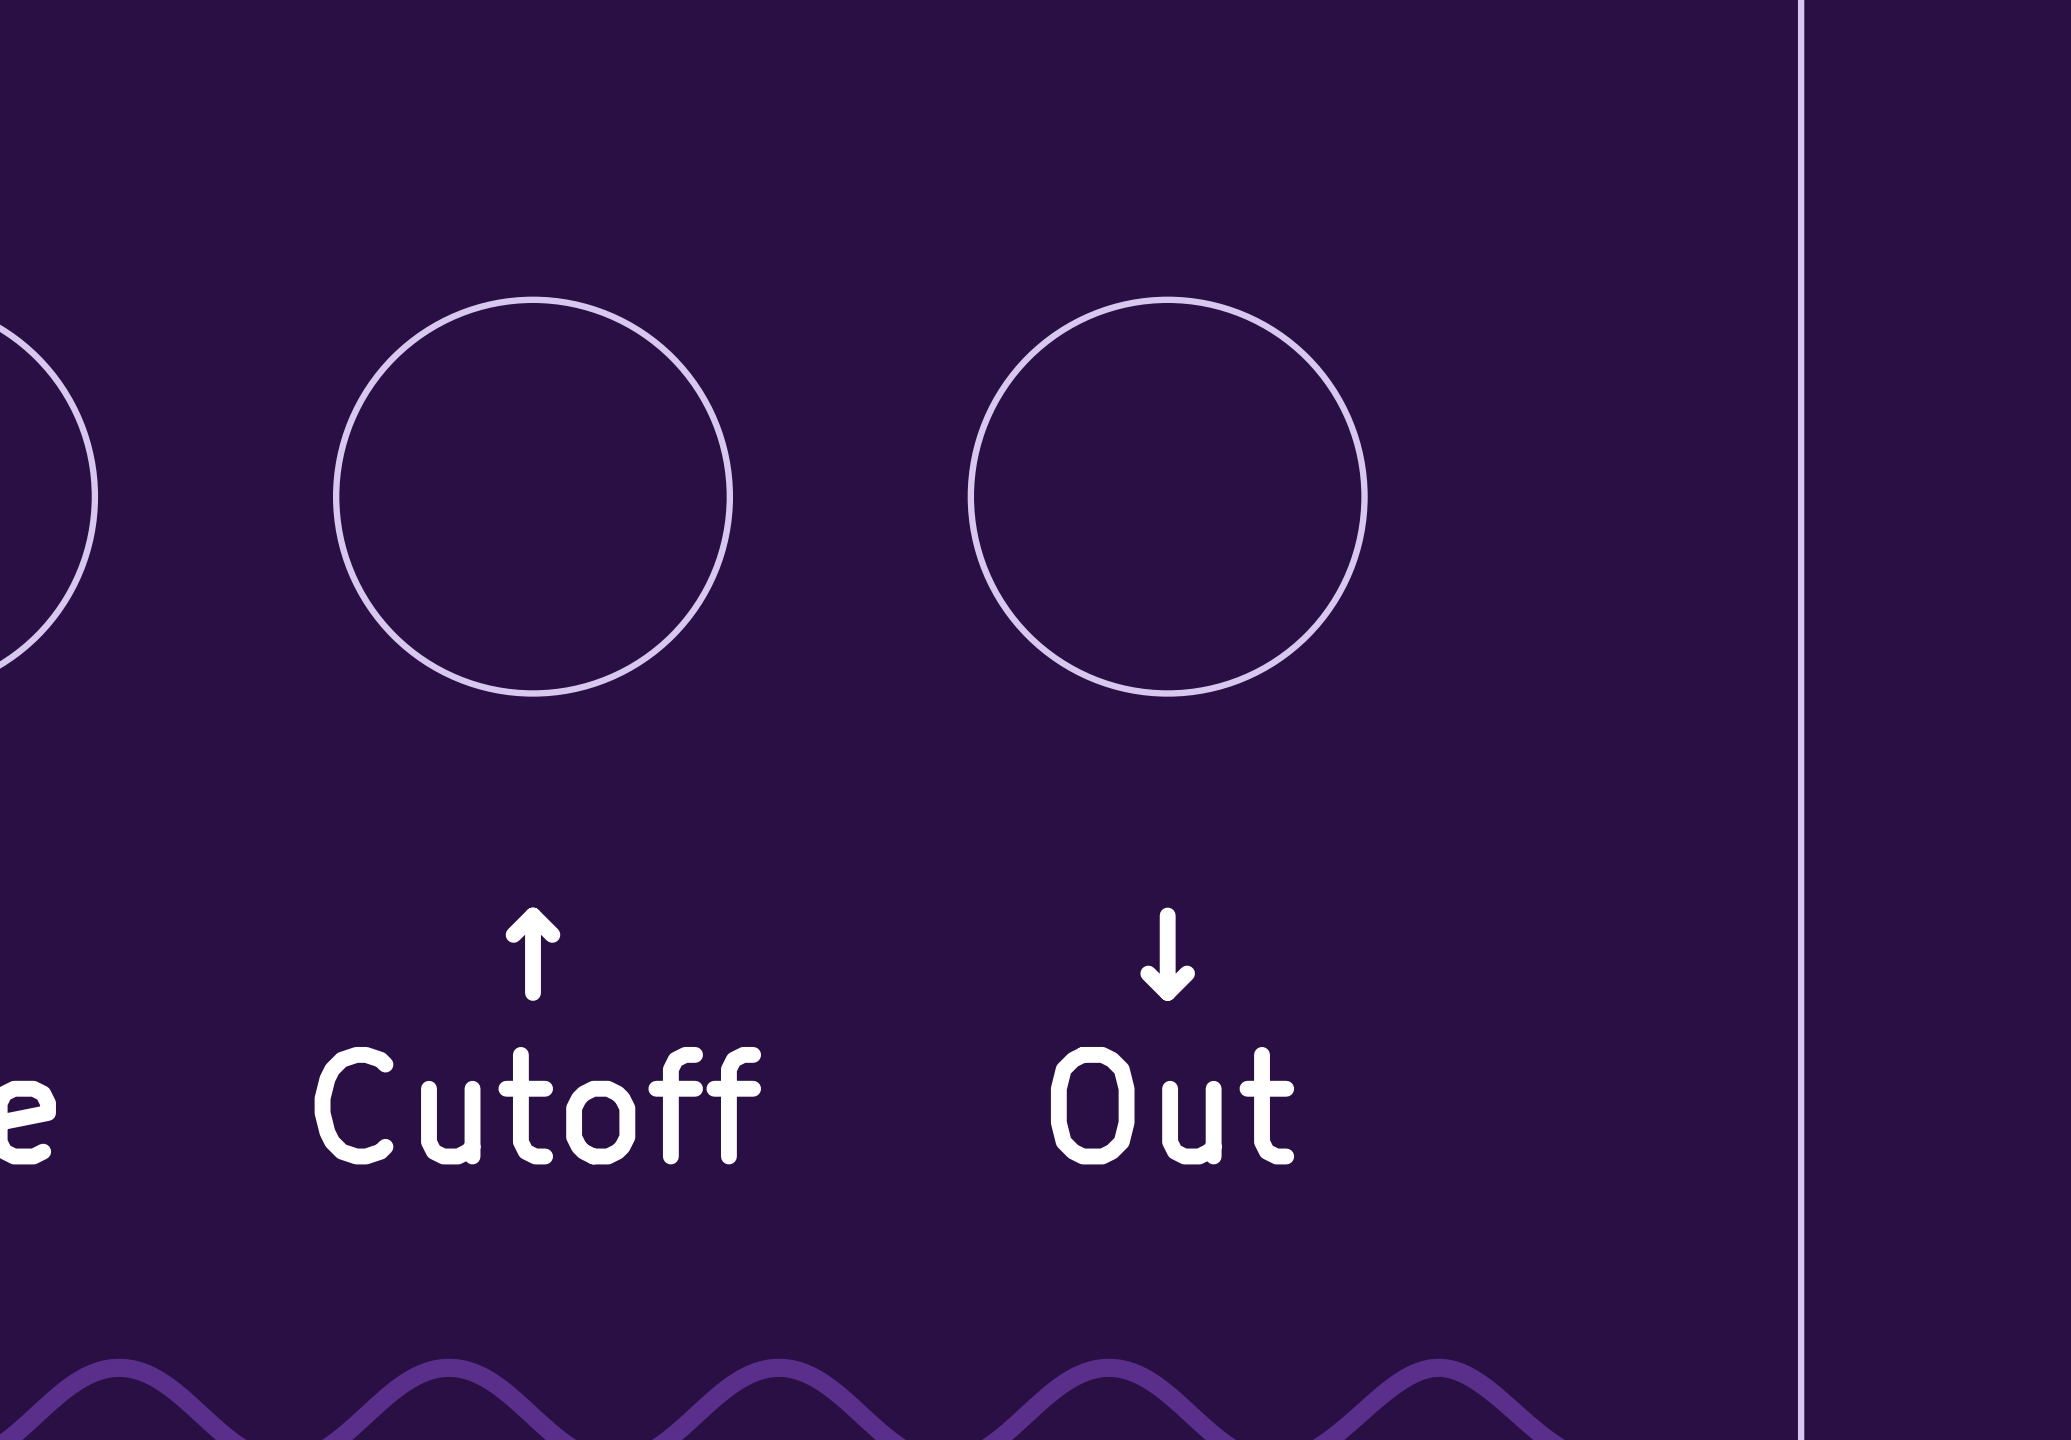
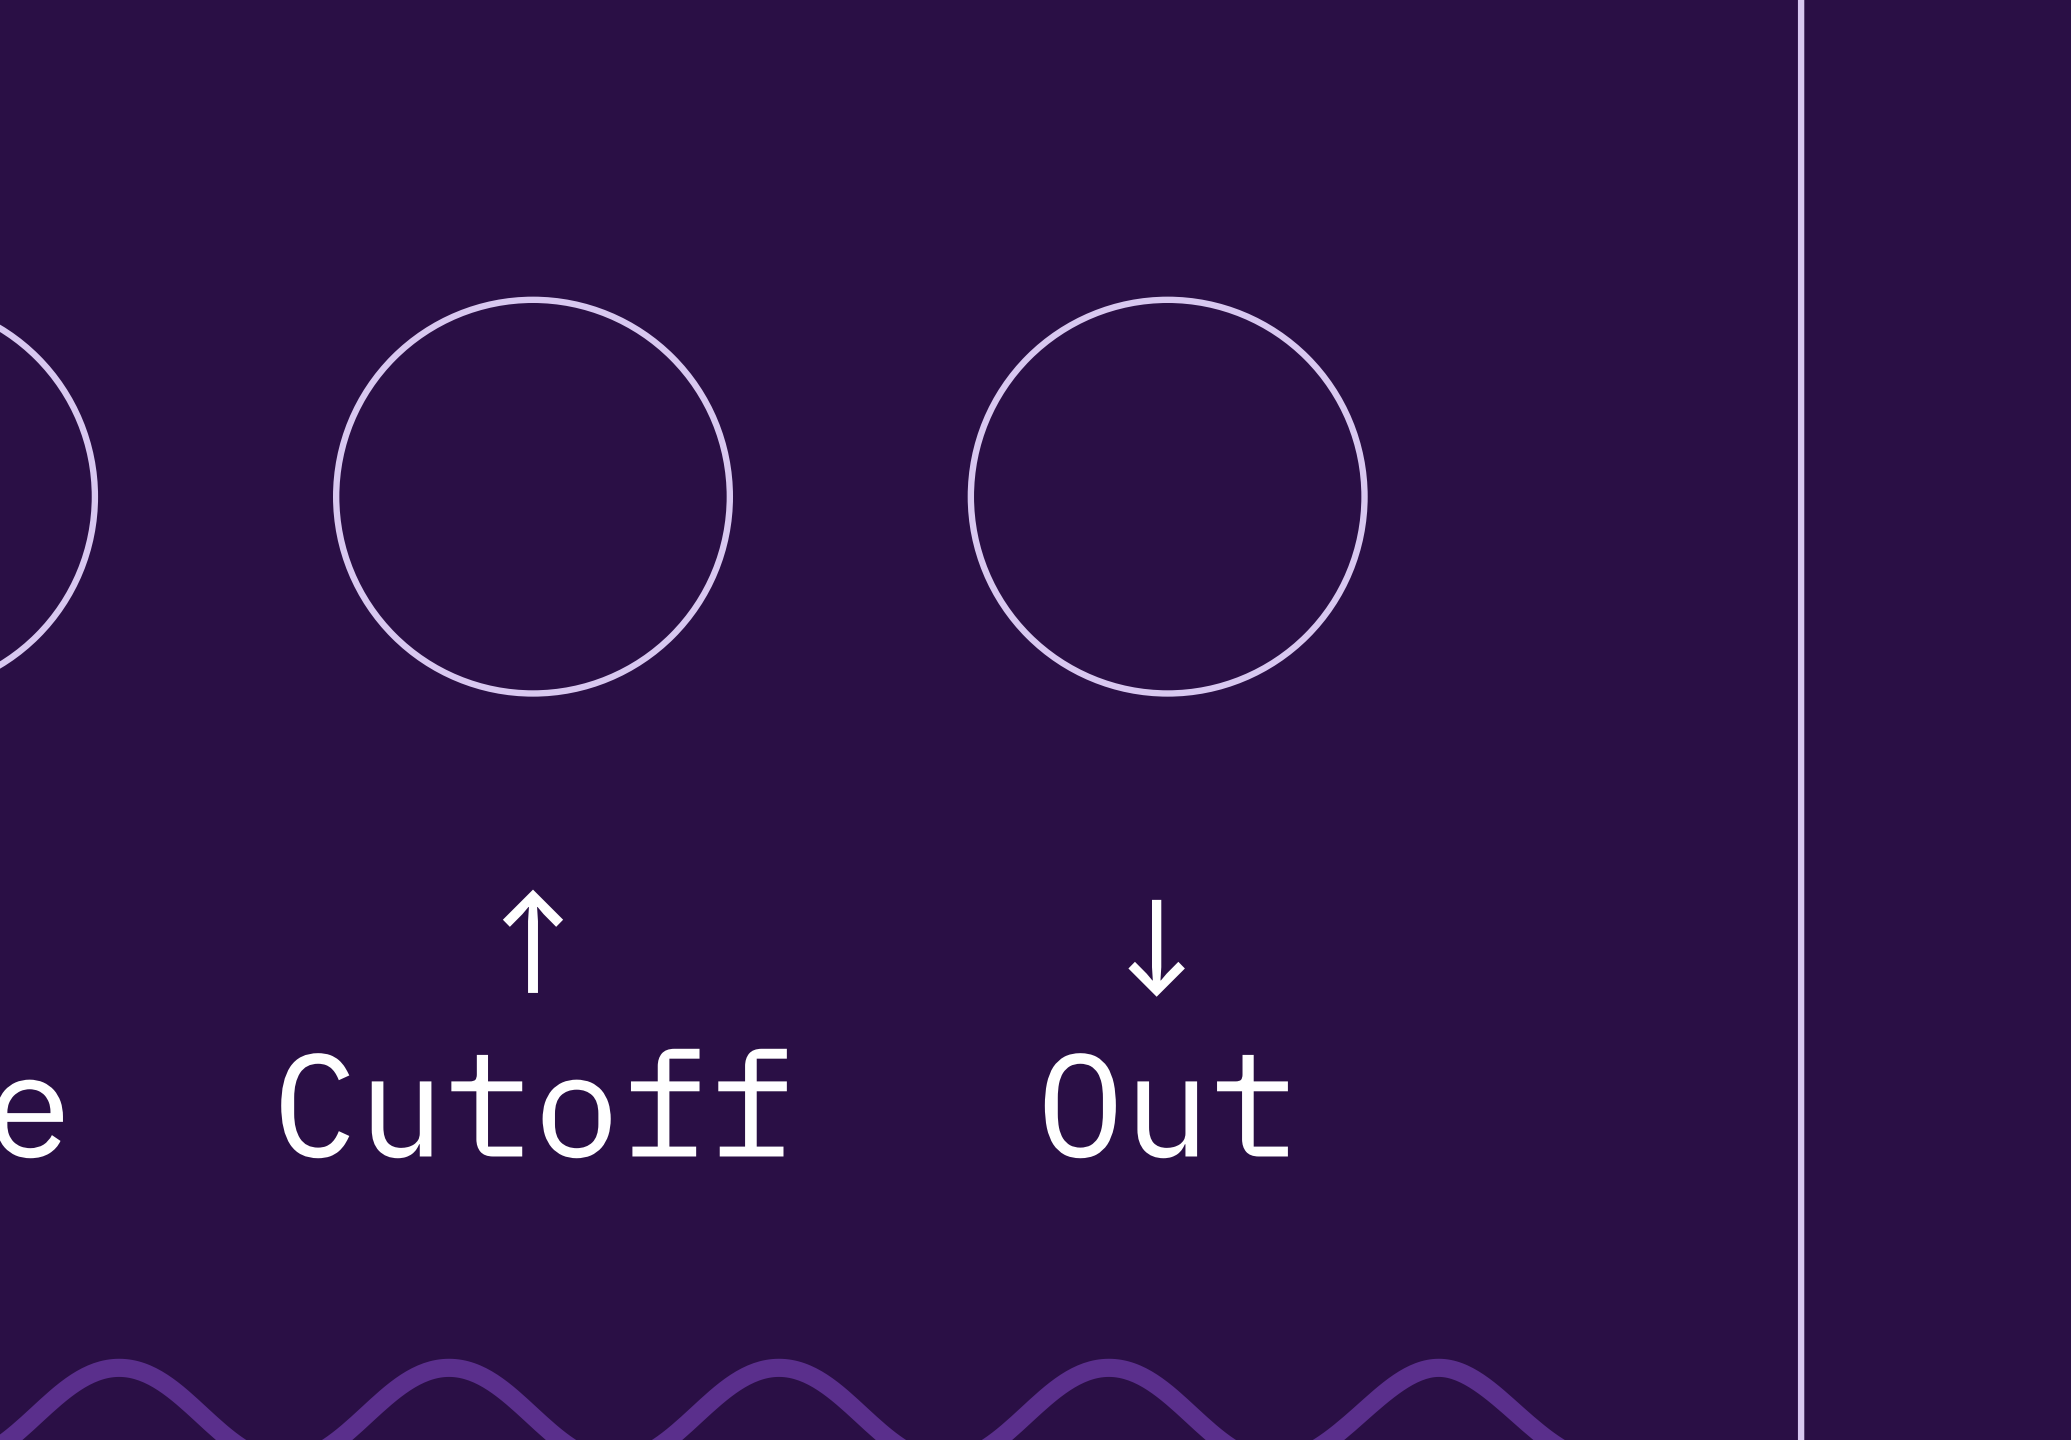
text position: ↓ (1167, 954) -> ↓ (1156, 948)

